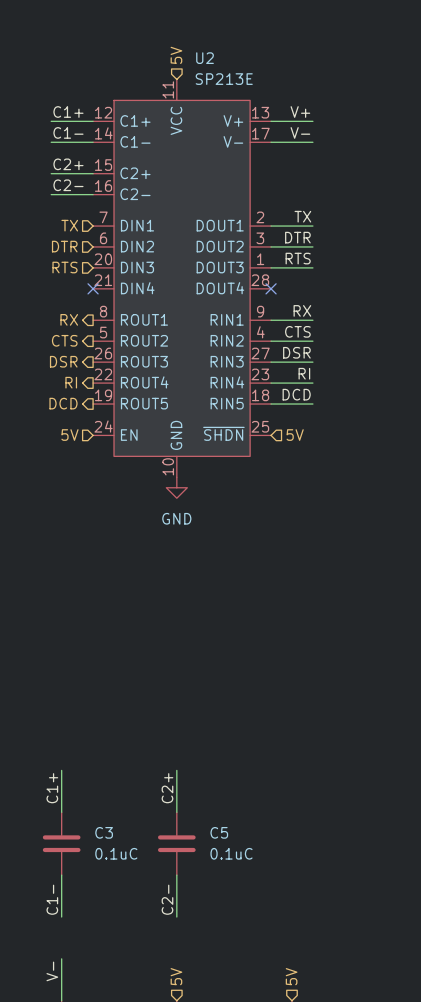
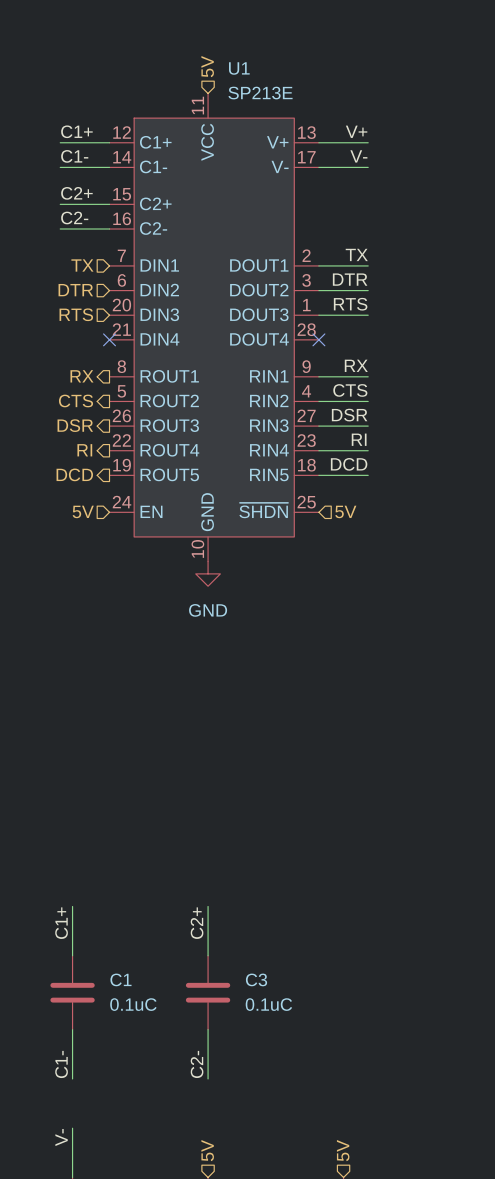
U2 name: U2 (205, 58) -> U1 (239, 68)
C3 name: C3 (104, 832) -> C1 (120, 979)
C5 name: C5 (219, 832) -> C3 (256, 979)

